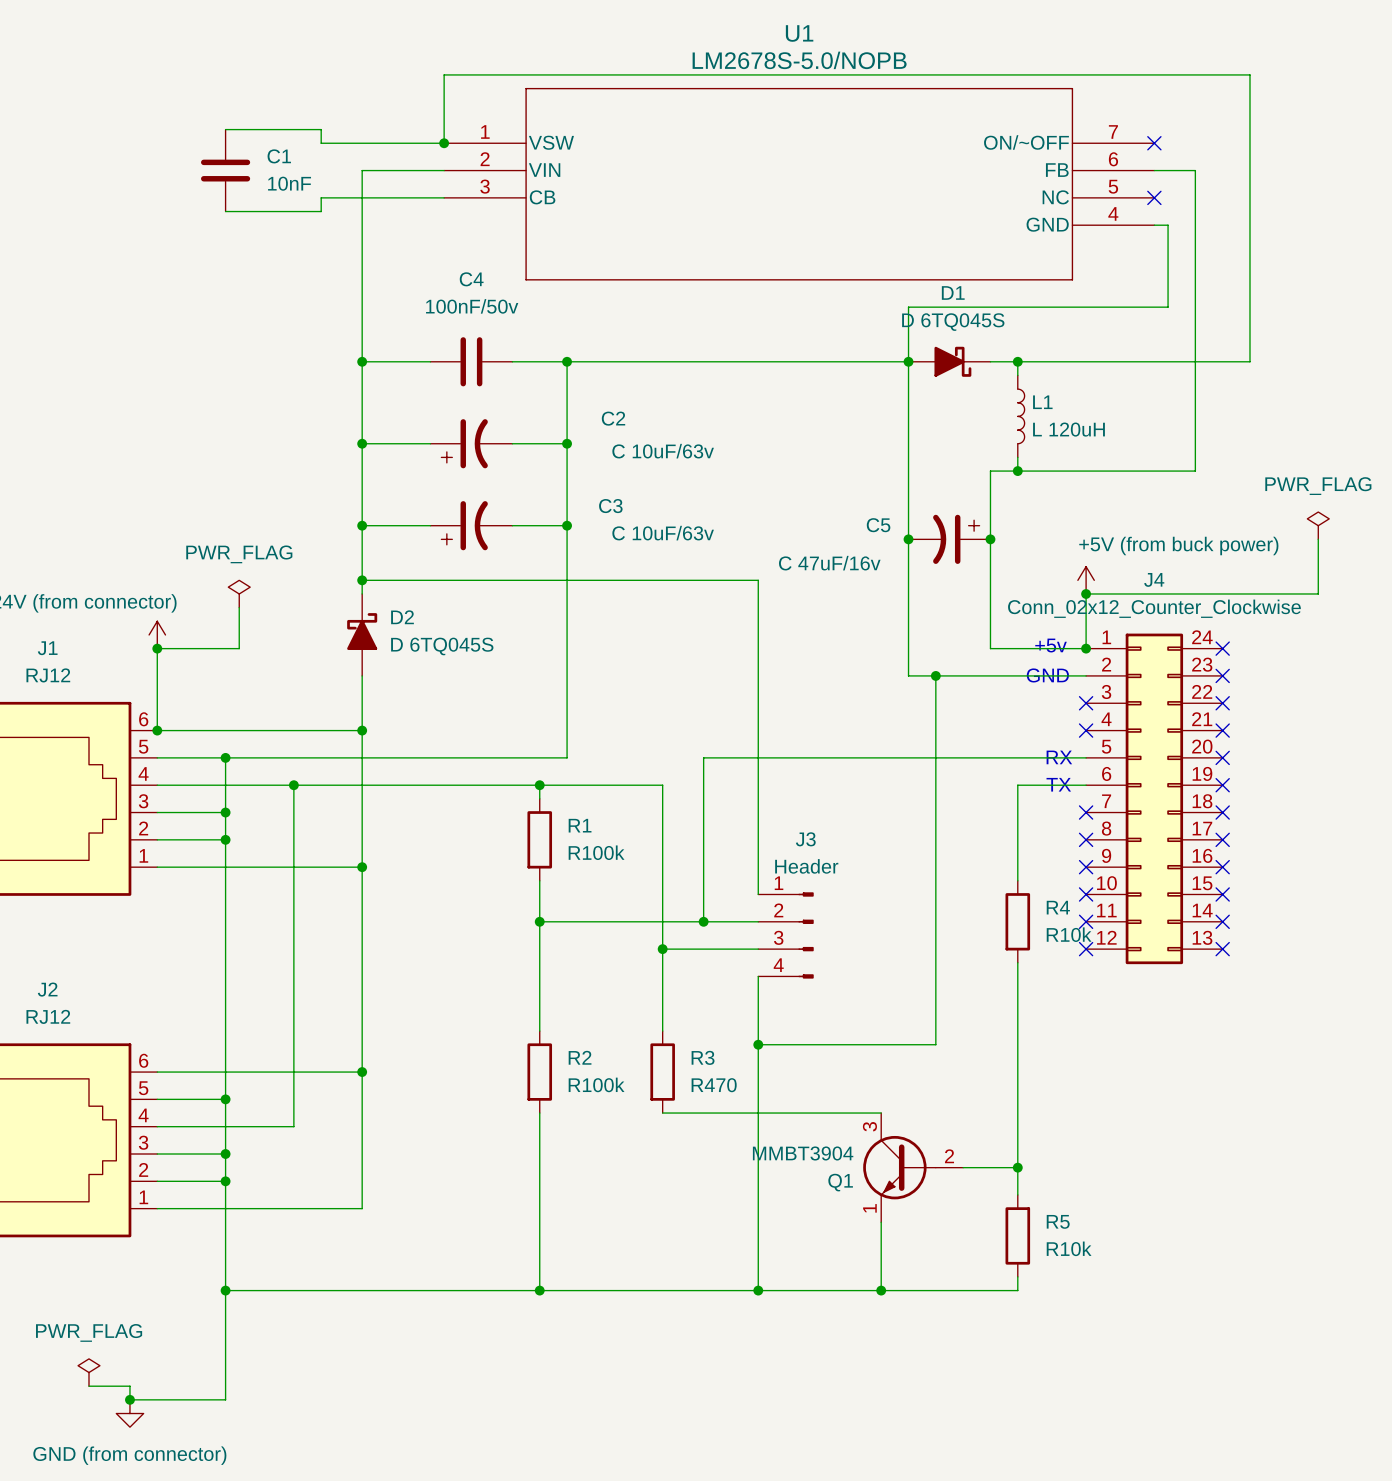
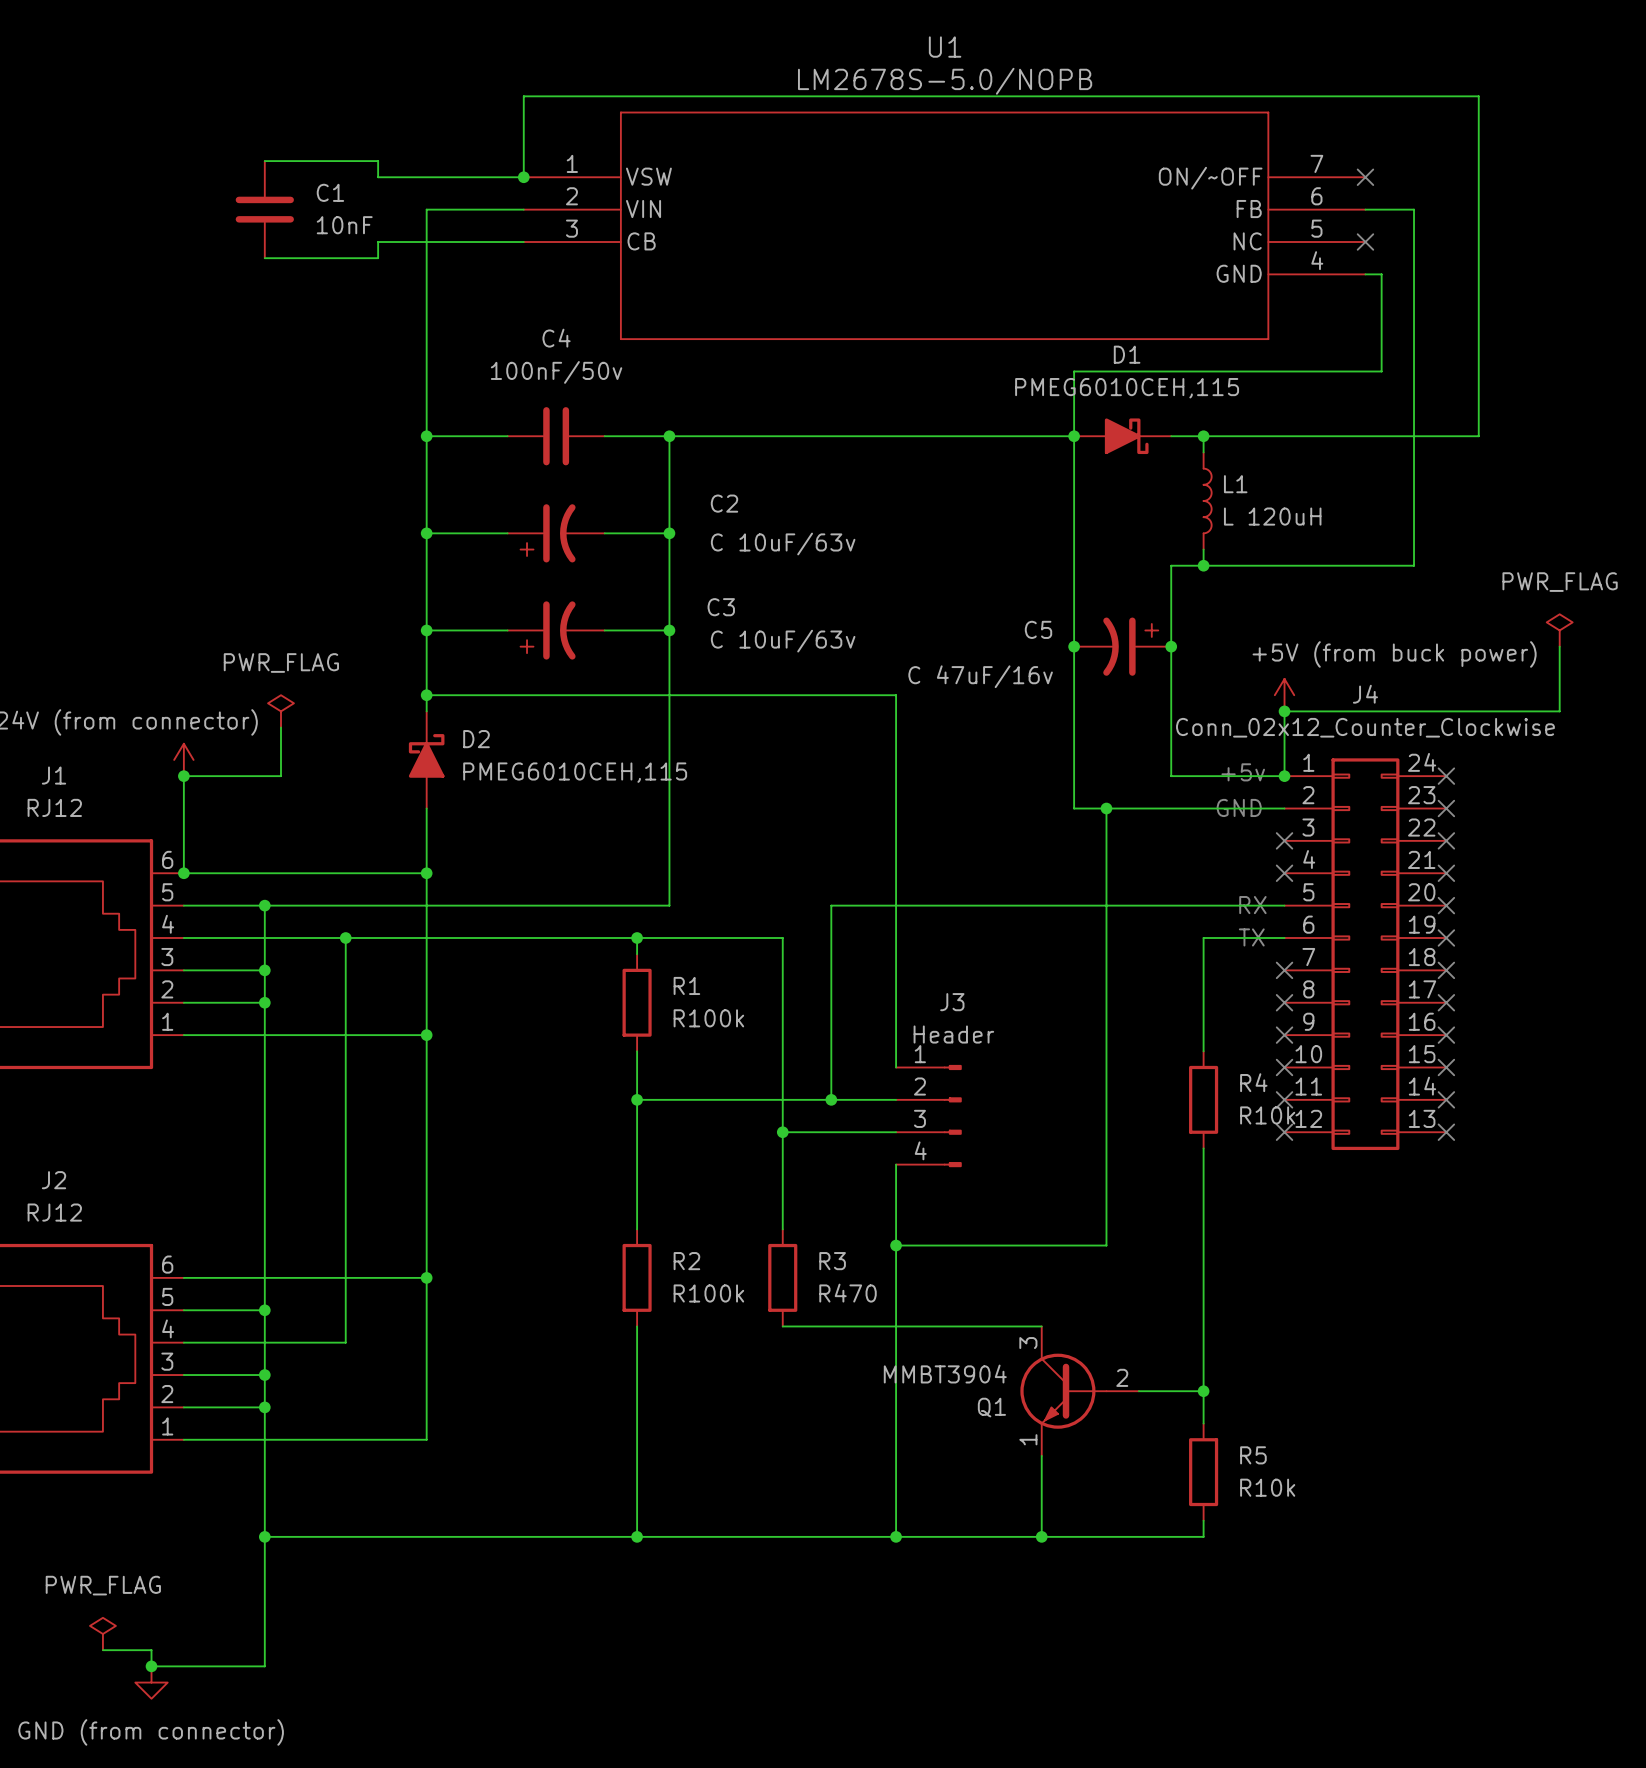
D1 value: D 6TQ045S (953, 322) -> PMEG6010CEH,115 (1127, 388)
D2 value: D 6TQ045S (442, 646) -> PMEG6010CEH,115 (575, 772)

